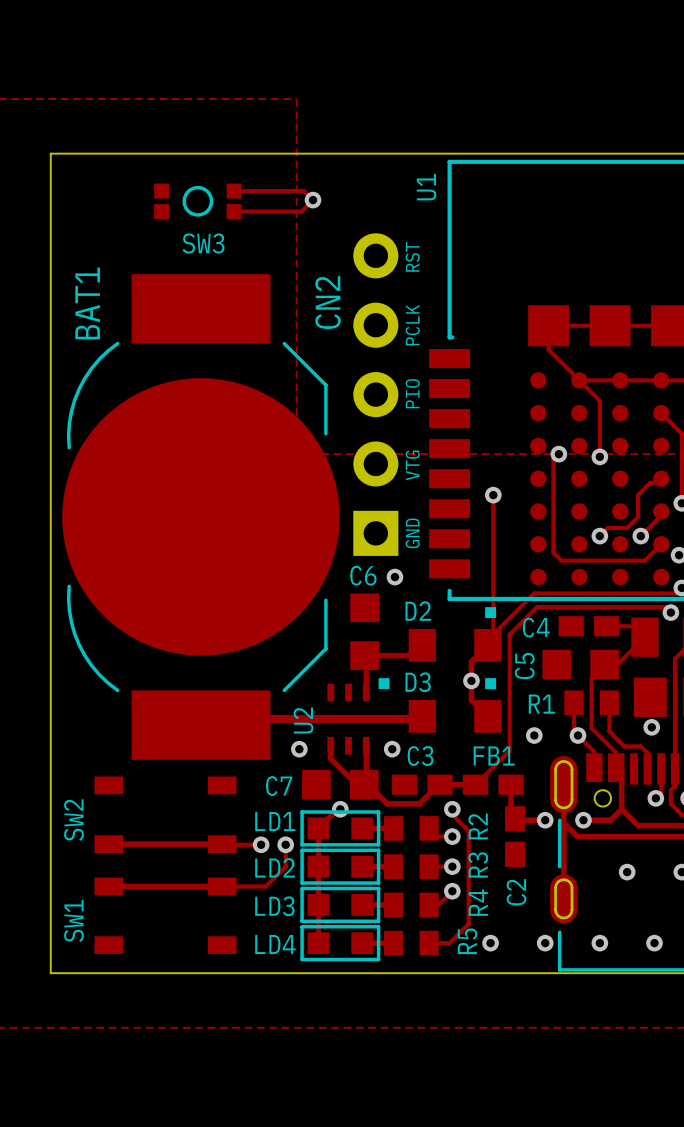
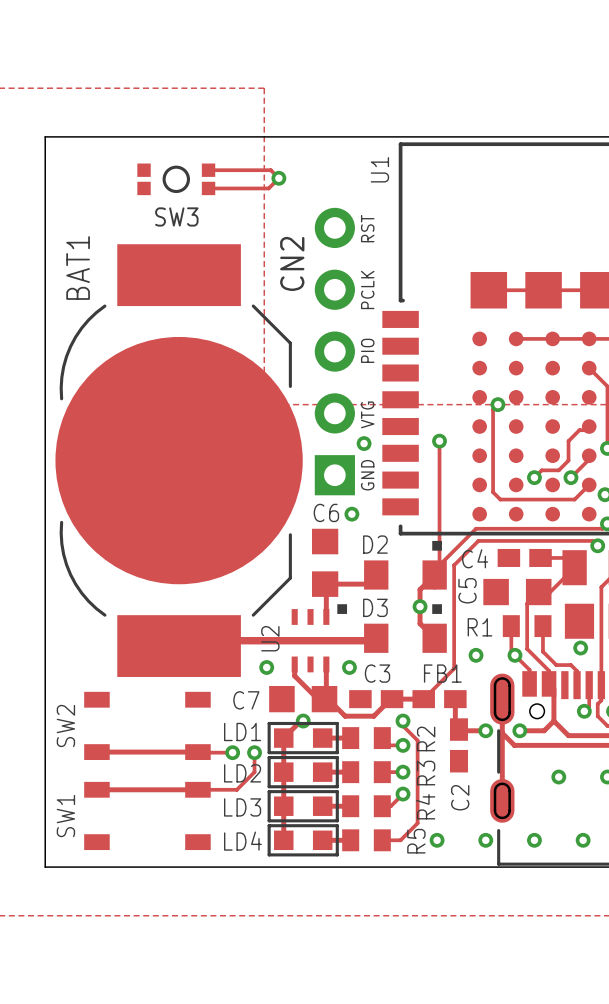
track: (548, 325) (548, 349) (599, 400) (599, 456) -> none
via: (599, 456) -> none
via: none -> (364, 443)

